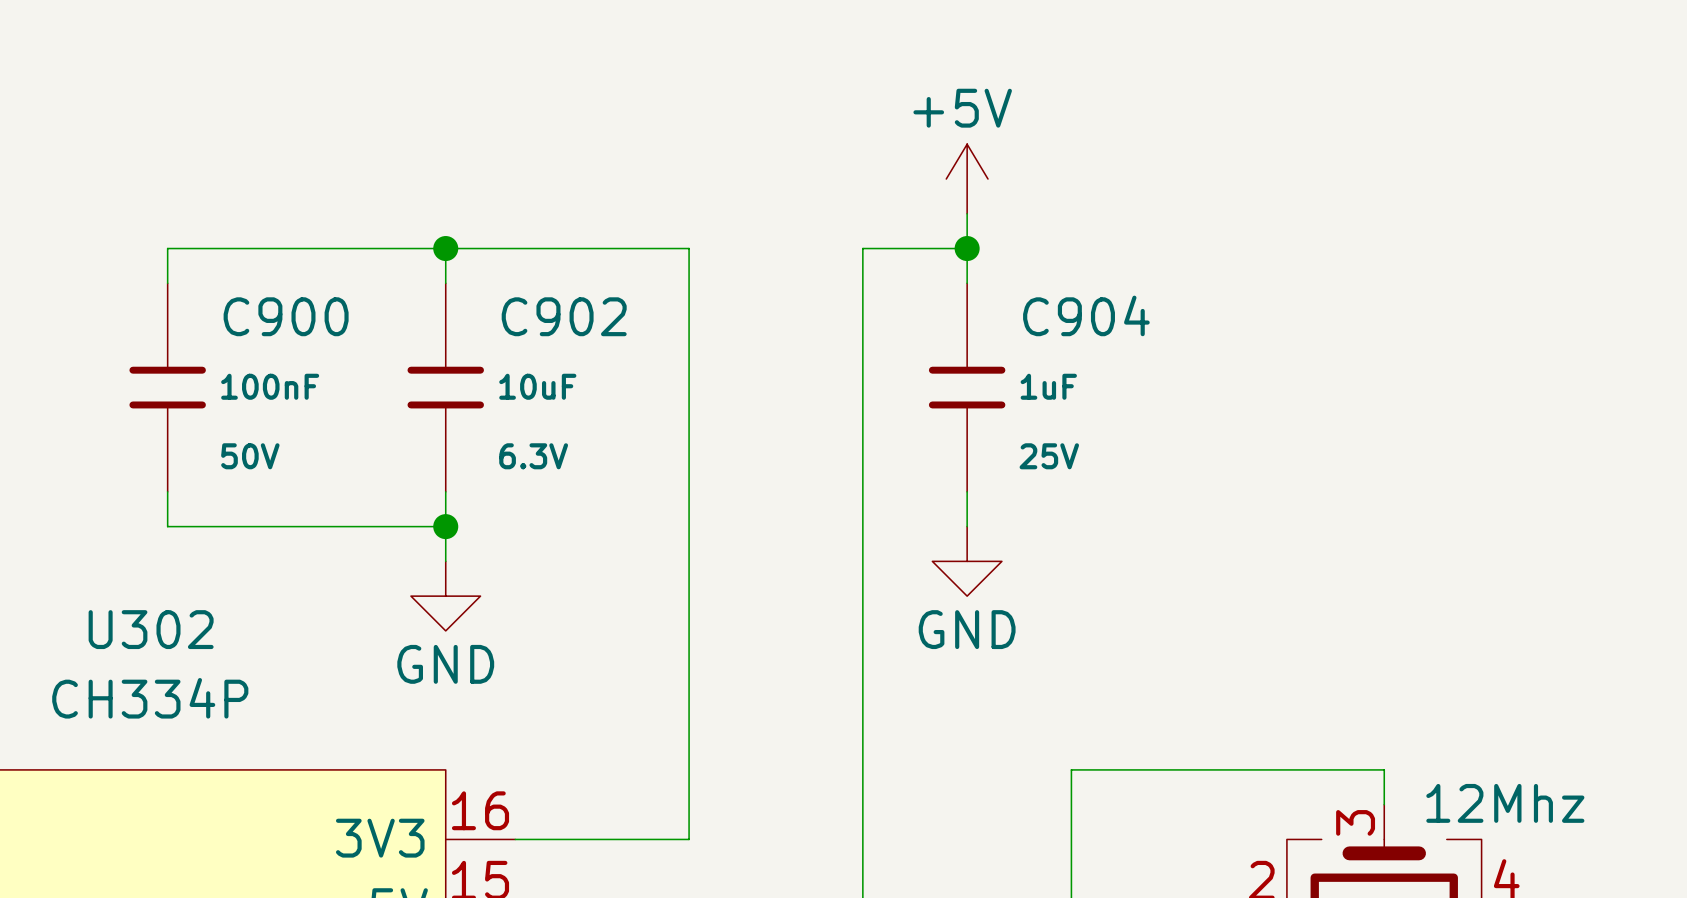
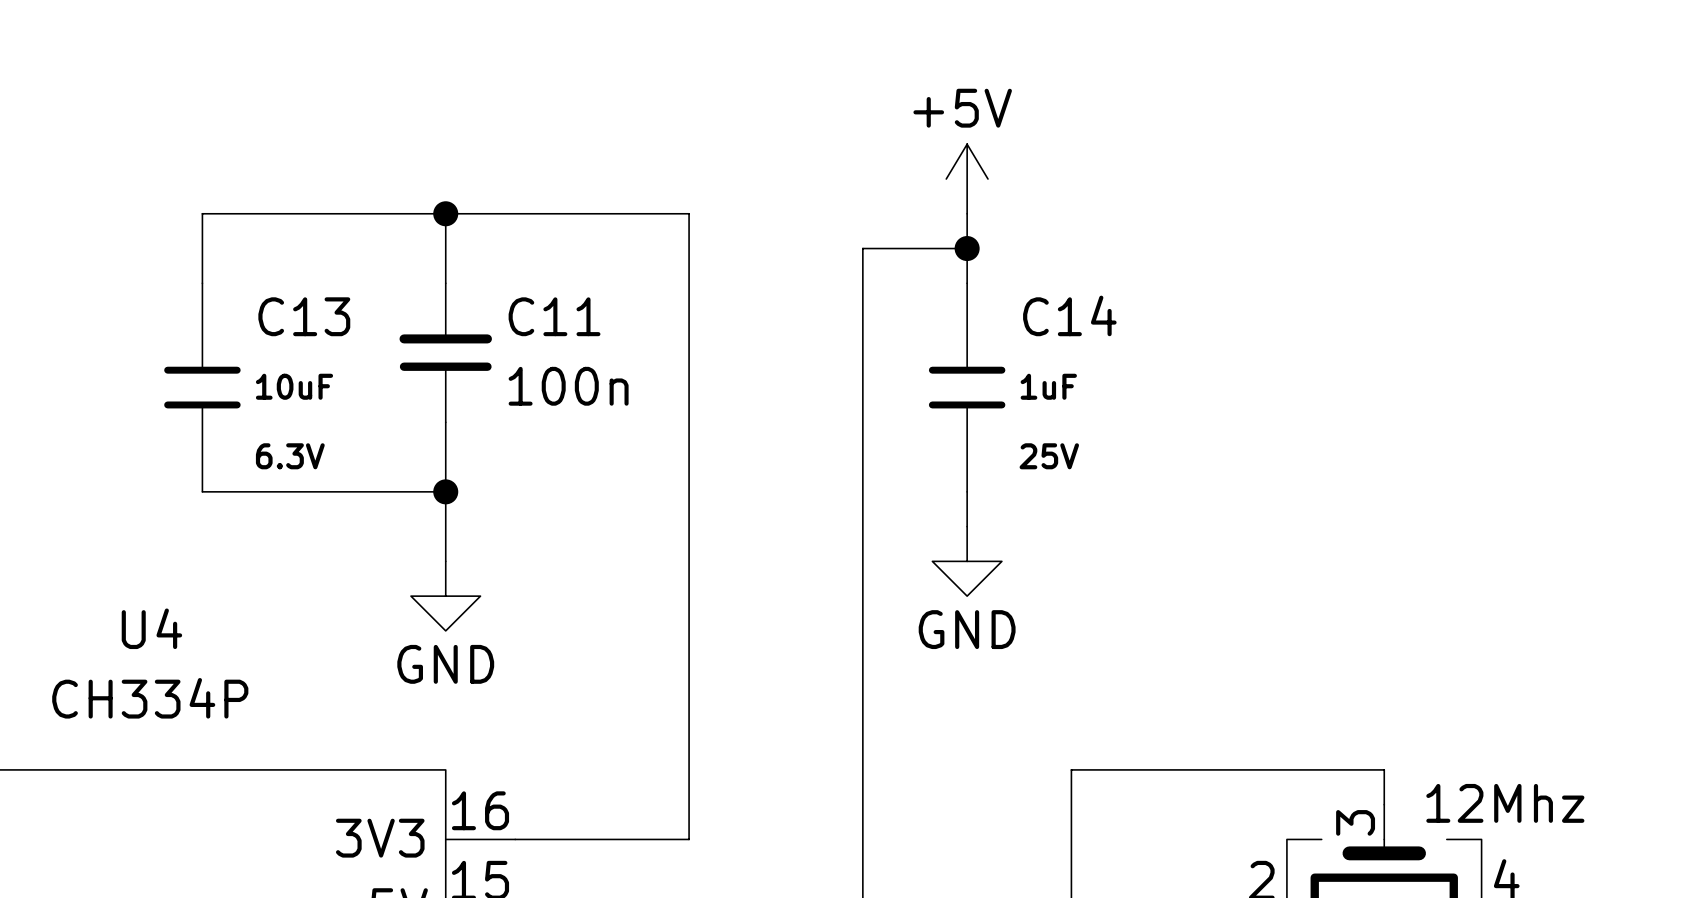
wire: none -> (445, 213) (445, 248)
junction position: (445, 248) -> (445, 213)
wire: (689, 248) (167, 248) (167, 283) -> (689, 248) (689, 213) (202, 213) (202, 283)
C904 name: C904 (1086, 315) -> C14 (1069, 315)
C11: none -> (445, 352)
C900: 100nF (167, 387) -> none
C13: none -> 10uF (202, 387)
C902: 10uF (445, 387) -> none
wire: none -> (445, 422) (445, 491) (202, 491)
wire: (167, 491) (167, 526) (445, 526) -> none
junction position: (445, 526) -> (445, 491)
U302 name: U302 (151, 629) -> U4 (151, 628)

